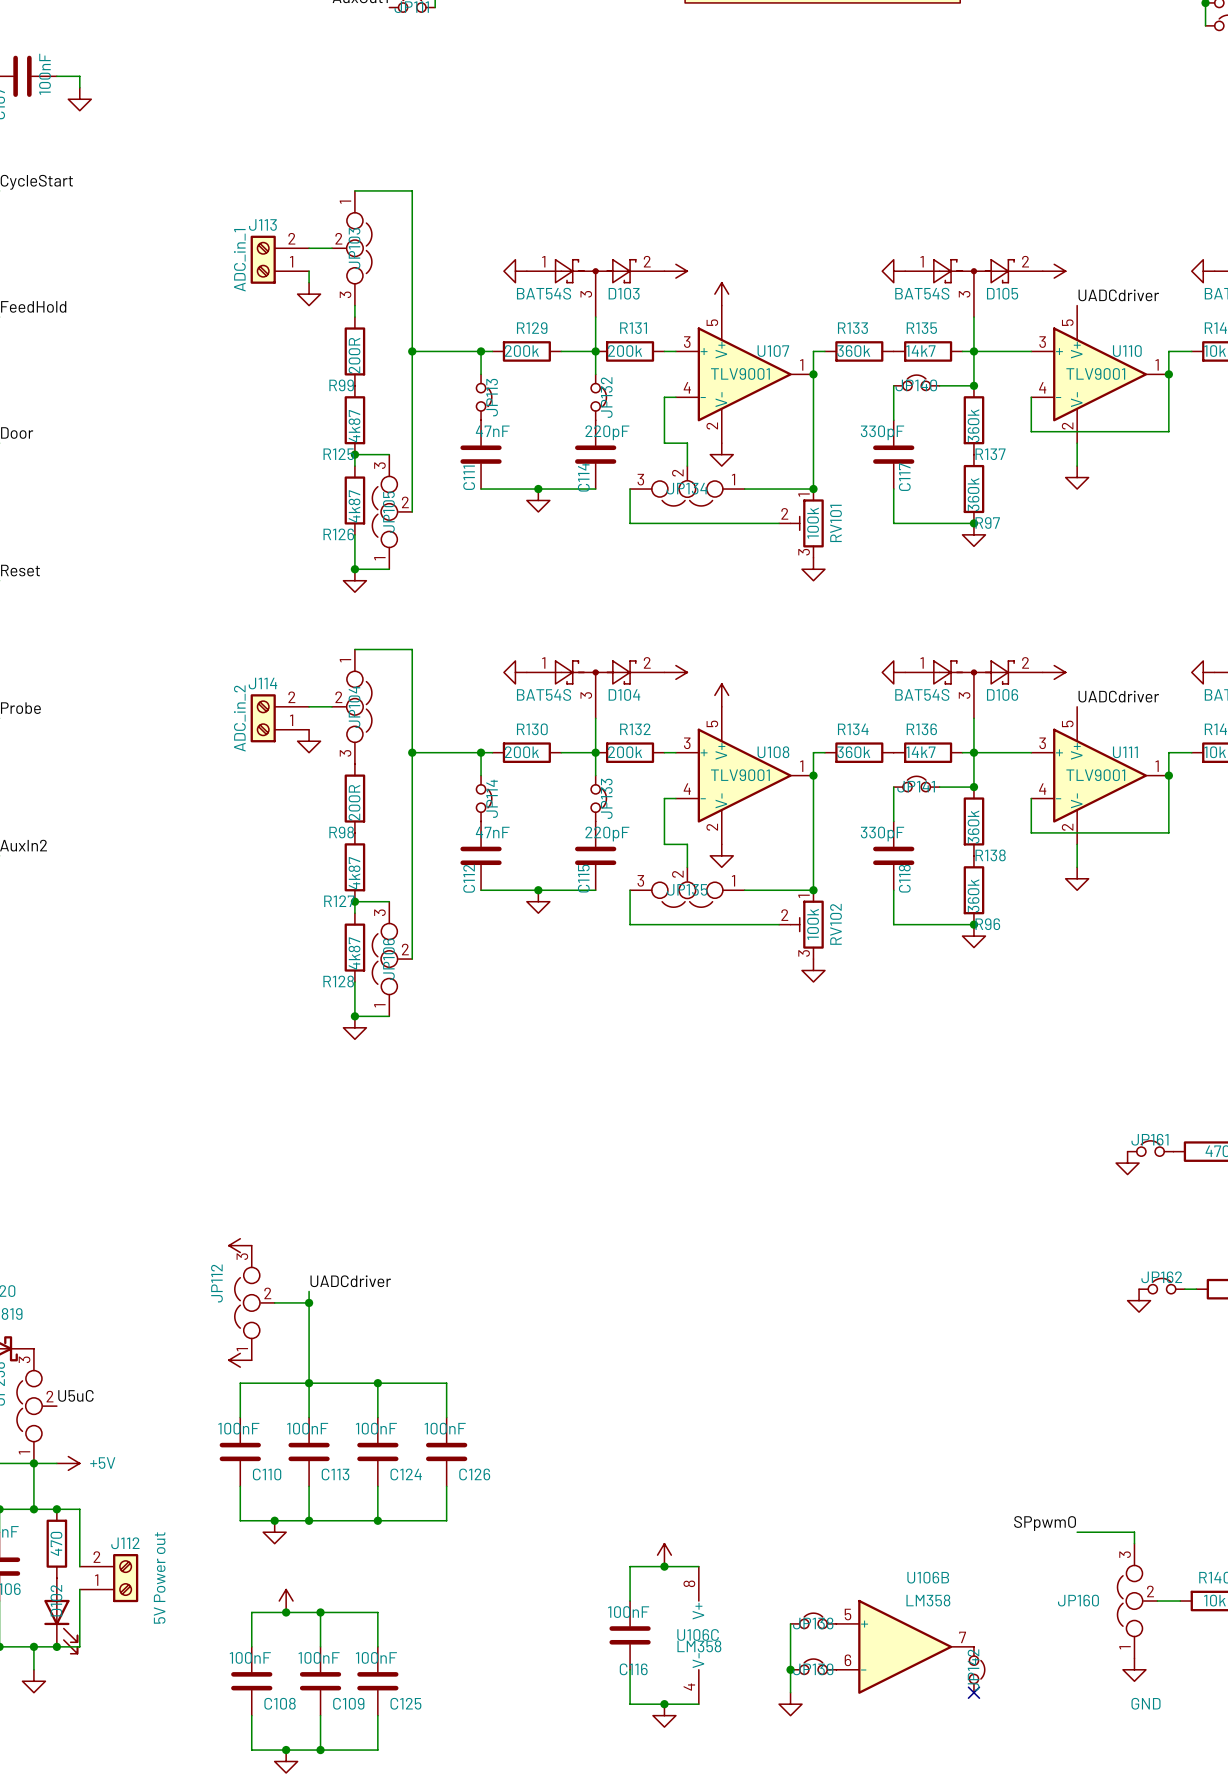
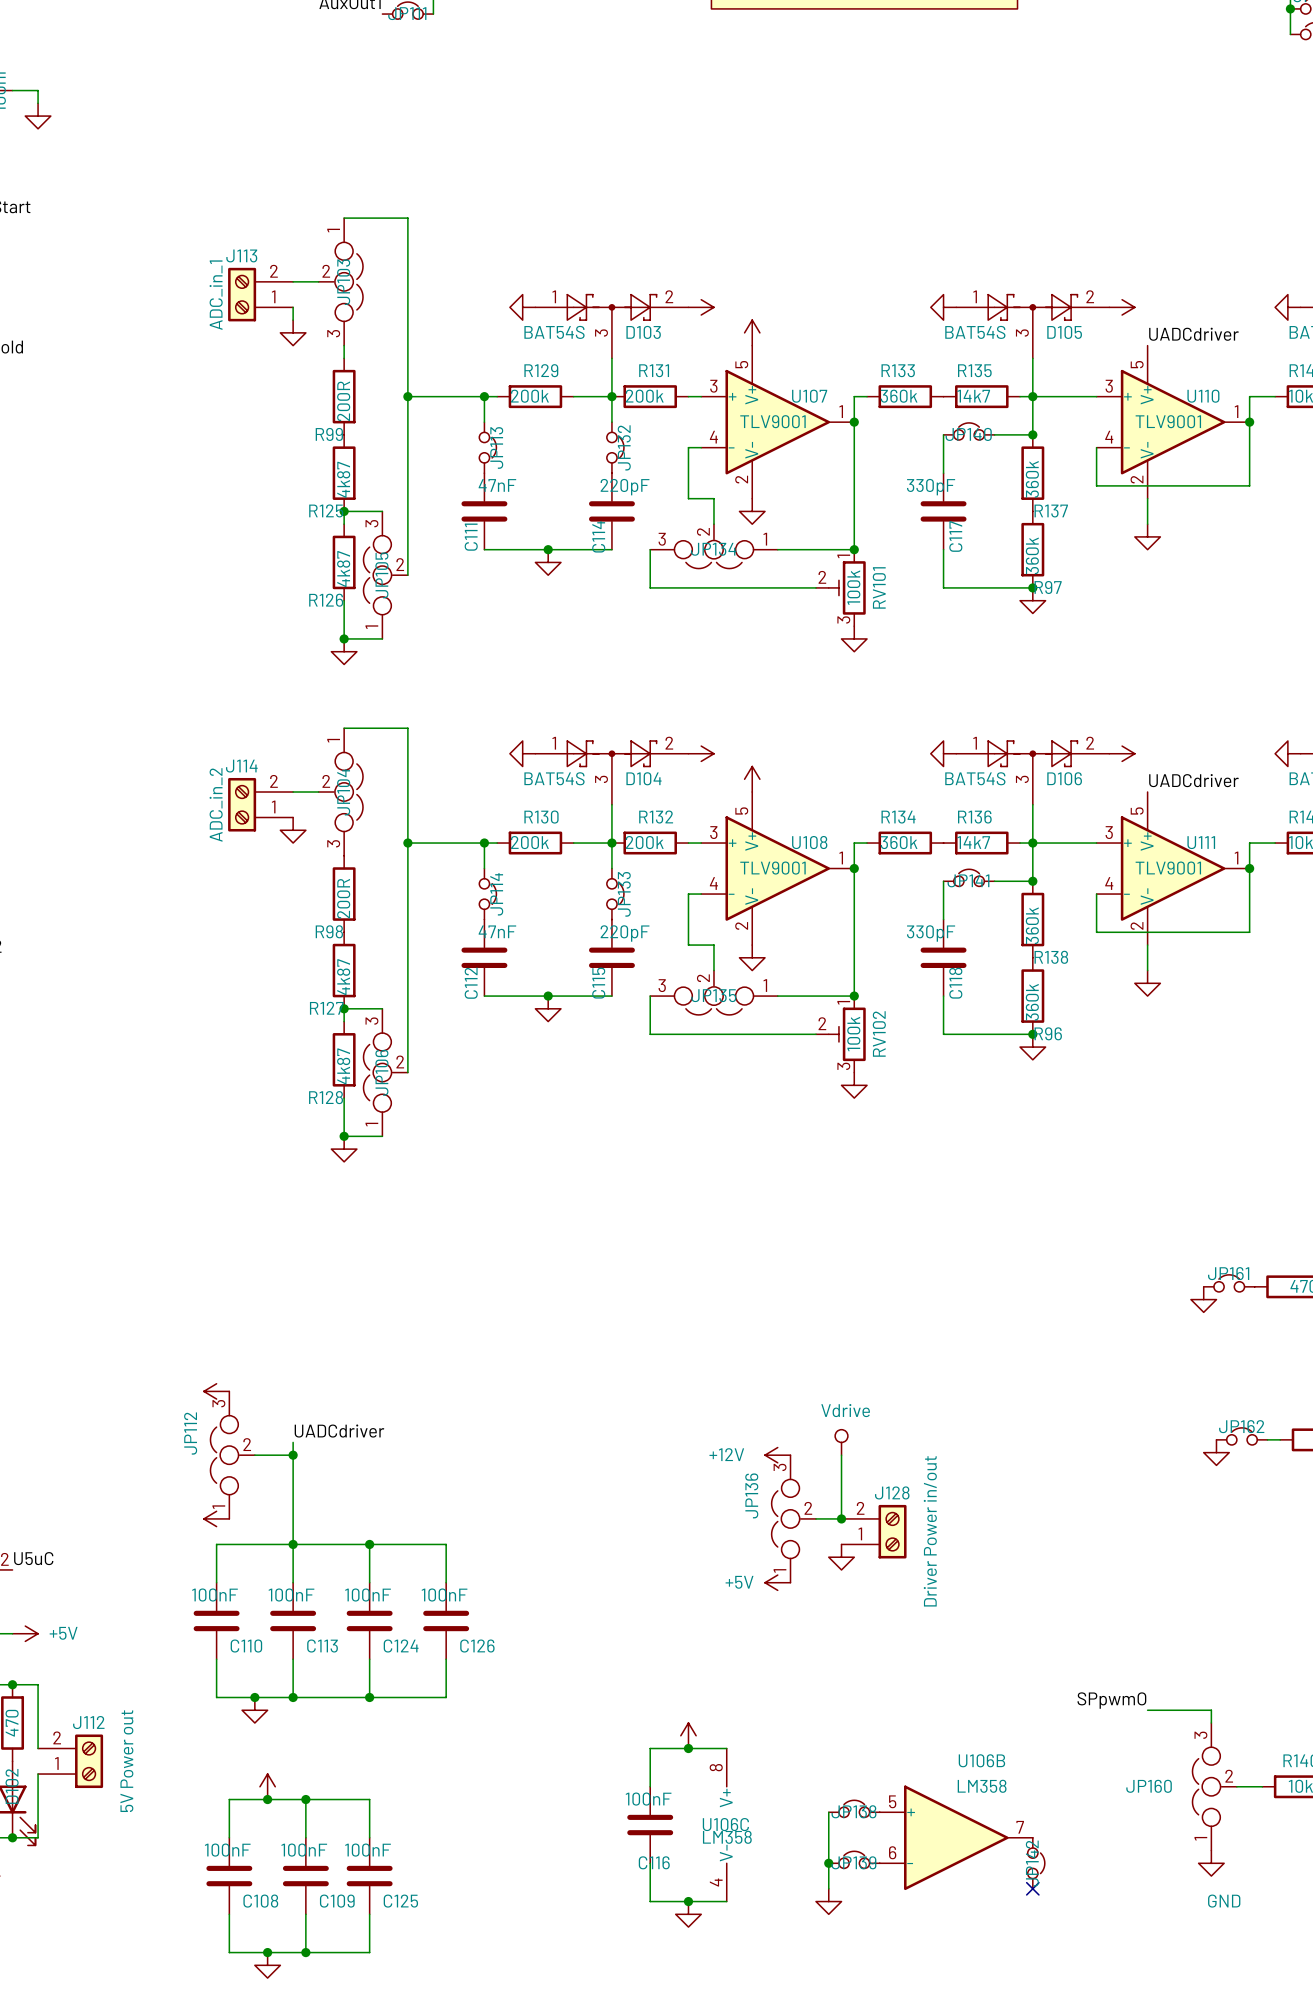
power symbol: none -> Vdrive (841, 1442)
power symbol: none -> +12V (777, 1455)
wire: none -> (841, 1455) (841, 1518) (816, 1518)
JP136: none -> (793, 1518)
junction: none -> (841, 1518)
J128: none -> Driver Power in/out (874, 1531)
power symbol: none -> (841, 1557)
power symbol: none -> +5V (777, 1582)

